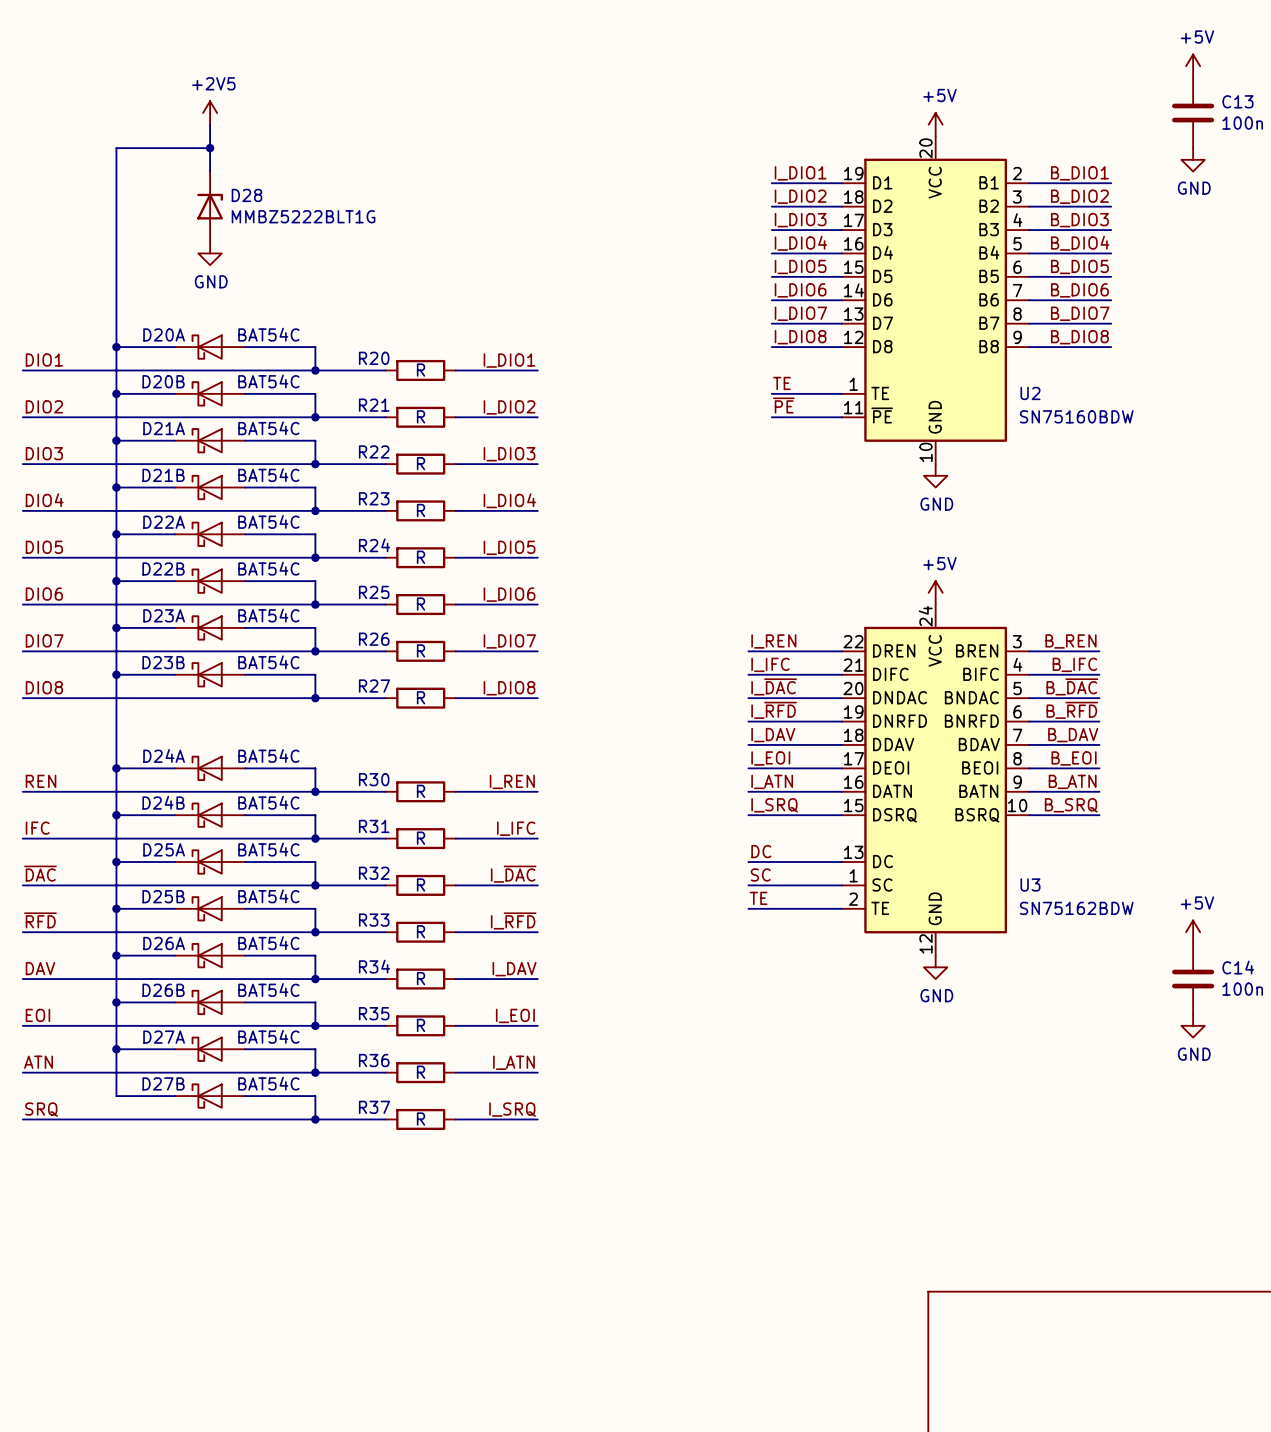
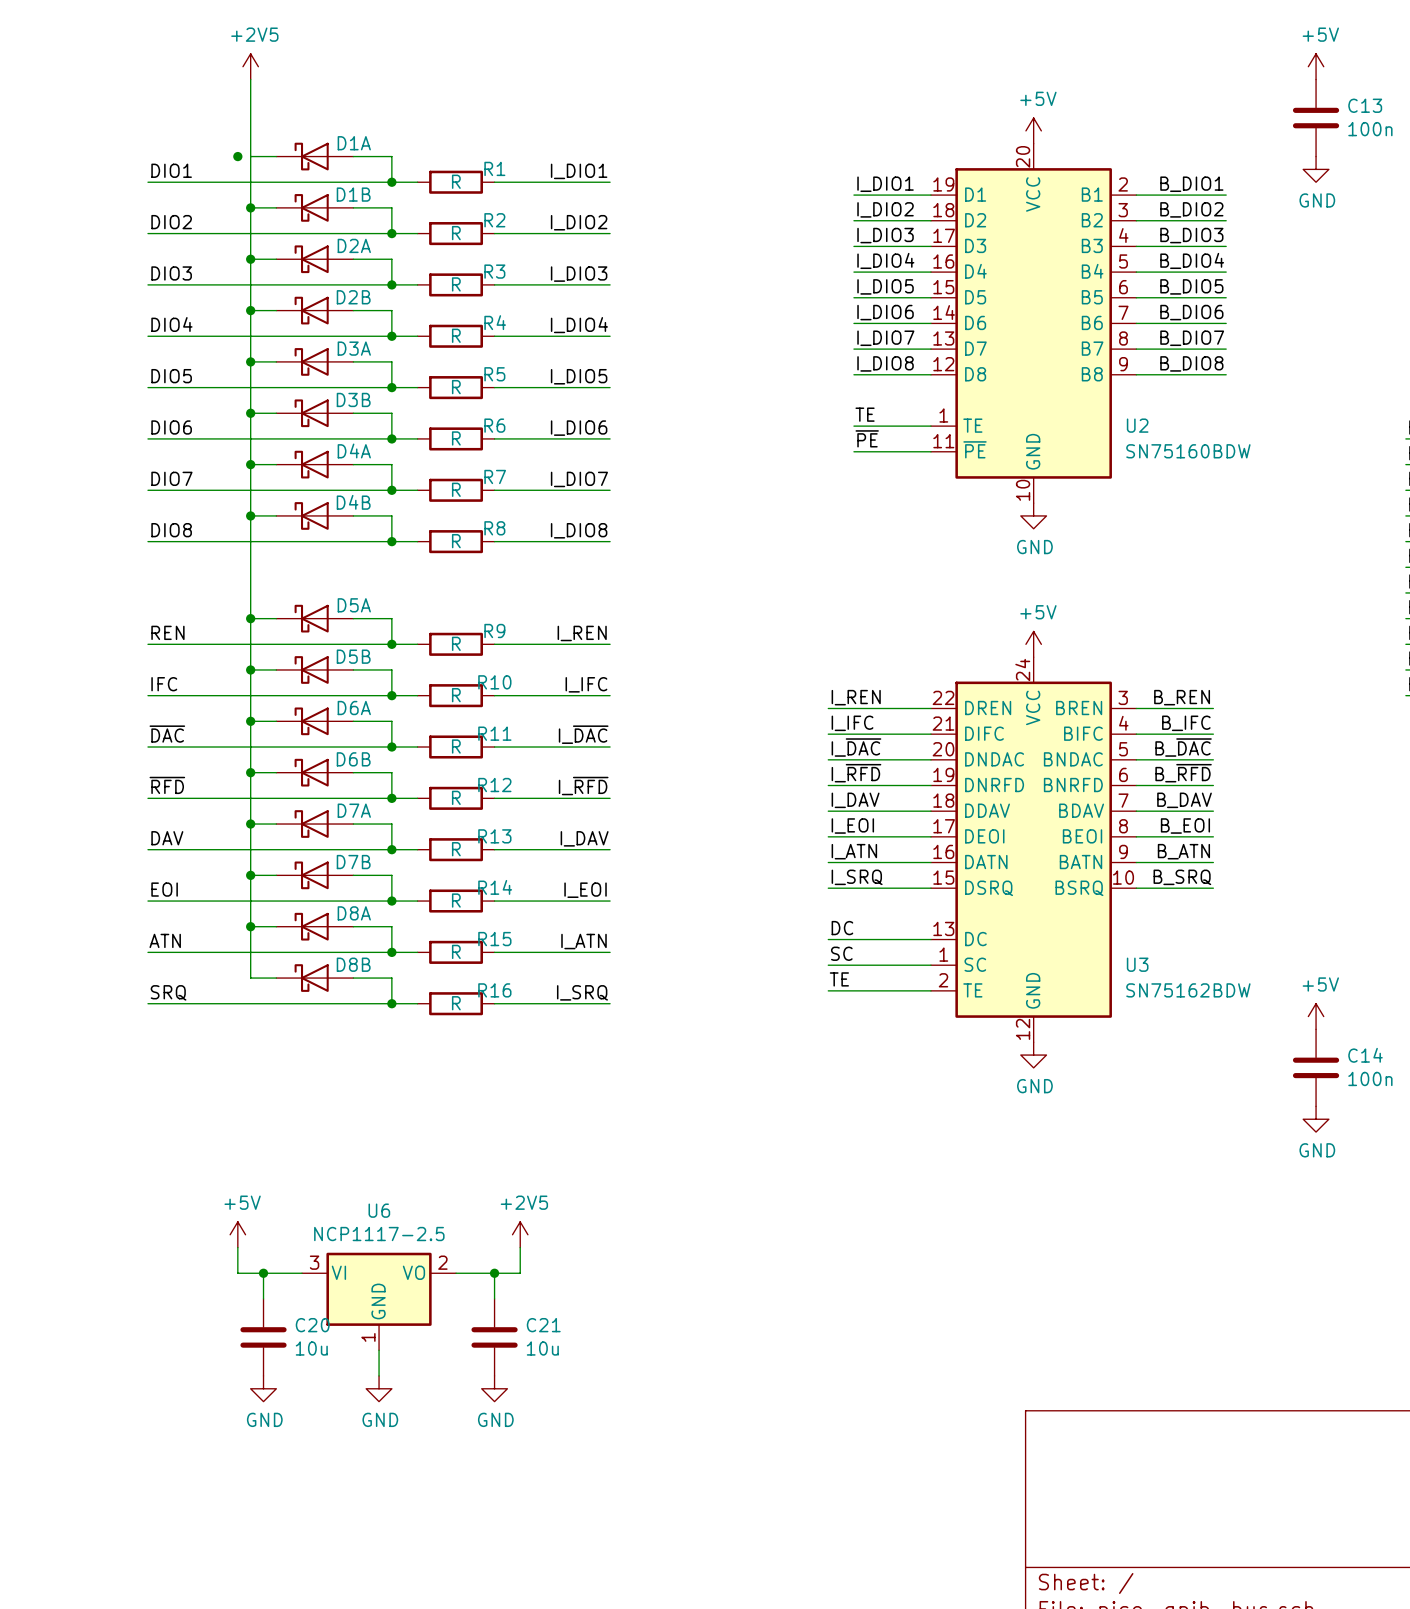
wire: none -> (250, 79) (250, 978) (276, 978)
power symbol position: +2V5 (210, 113) -> +2V5 (250, 66)
wire: (210, 124) (210, 171) -> none
wire: (210, 148) (116, 148) (116, 1096) (174, 1096) -> none
wire: none -> (250, 156) (276, 156)
D1A: none -> (314, 156)
wire: none -> (353, 156) (391, 156) (391, 182)
wire: none -> (147, 182) (417, 182)
junction: none -> (391, 182)
R1: none -> R (456, 182)
wire: none -> (494, 182) (610, 182)
wire: none -> (250, 207) (276, 207)
junction: none -> (250, 207)
D1B: none -> (314, 207)
wire: none -> (353, 207) (391, 207) (391, 233)
D28: MMBZ5222BLT1G (210, 206) -> none
wire: none -> (147, 233) (417, 233)
junction: none -> (391, 233)
R2: none -> R (456, 233)
wire: none -> (494, 233) (610, 233)
wire: none -> (250, 259) (276, 259)
junction: none -> (250, 259)
D2A: none -> (314, 259)
wire: none -> (353, 259) (391, 259) (391, 284)
power symbol: GND (210, 253) -> none
wire: none -> (147, 284) (417, 284)
junction: none -> (391, 284)
R3: none -> R (456, 284)
wire: none -> (494, 284) (610, 284)
wire: none -> (250, 310) (276, 310)
junction: none -> (250, 310)
D2B: none -> (314, 310)
wire: none -> (353, 310) (391, 310) (391, 336)
wire: none -> (147, 336) (417, 336)
junction: none -> (391, 336)
R4: none -> R (456, 336)
wire: none -> (494, 336) (610, 336)
wire: none -> (250, 361) (276, 361)
junction: none -> (250, 361)
D3A: none -> (314, 361)
wire: none -> (353, 361) (391, 361) (391, 387)
wire: (116, 347) (174, 347) -> none
junction: (116, 347) -> none
D20A: BAT54C (210, 347) -> none
wire: (245, 347) (315, 347) (315, 370) -> none
wire: none -> (147, 387) (417, 387)
junction: none -> (391, 387)
R5: none -> R (456, 387)
wire: none -> (494, 387) (610, 387)
label position: DIO1 (44, 360) -> DIO1 (171, 170)
label position: I_DIO1 (509, 360) -> I_DIO1 (579, 171)
wire: (22, 370) (385, 370) -> none
junction: (315, 370) -> none
R20: R (420, 370) -> none
wire: (455, 370) (537, 370) -> none
wire: none -> (250, 413) (276, 413)
junction: none -> (250, 413)
D3B: none -> (314, 413)
wire: none -> (353, 413) (391, 413) (391, 438)
wire: (116, 393) (174, 393) -> none
junction: (116, 393) -> none
D20B: BAT54C (210, 393) -> none
wire: (245, 393) (315, 393) (315, 417) -> none
wire: none -> (147, 438) (417, 438)
junction: none -> (391, 438)
R6: none -> R (456, 438)
wire: none -> (494, 438) (610, 438)
label position: DIO2 (44, 406) -> DIO2 (171, 222)
label position: I_DIO2 (509, 407) -> I_DIO2 (579, 222)
wire: (22, 417) (385, 417) -> none
junction: (315, 417) -> none
R21: R (420, 417) -> none
wire: (455, 417) (537, 417) -> none
wire: none -> (250, 464) (276, 464)
junction: none -> (250, 464)
D4A: none -> (314, 464)
wire: none -> (353, 464) (391, 464) (391, 490)
wire: (116, 440) (174, 440) -> none
junction: (116, 440) -> none
D21A: BAT54C (210, 440) -> none
wire: (245, 440) (315, 440) (315, 464) -> none
wire: none -> (147, 490) (417, 490)
junction: none -> (391, 490)
R7: none -> R (456, 490)
wire: none -> (494, 490) (610, 490)
label position: DIO3 (44, 453) -> DIO3 (171, 273)
label position: I_DIO3 (509, 454) -> I_DIO3 (579, 274)
wire: (22, 464) (385, 464) -> none
junction: (315, 464) -> none
R22: R (420, 464) -> none
wire: (455, 464) (537, 464) -> none
wire: none -> (250, 515) (276, 515)
junction: none -> (250, 515)
D4B: none -> (314, 515)
wire: none -> (353, 515) (391, 515) (391, 541)
wire: (116, 487) (174, 487) -> none
junction: (116, 487) -> none
D21B: BAT54C (210, 487) -> none
wire: (245, 487) (315, 487) (315, 510) -> none
wire: none -> (147, 541) (417, 541)
junction: none -> (391, 541)
R8: none -> R (456, 541)
wire: none -> (494, 541) (610, 541)
label position: DIO4 (44, 500) -> DIO4 (171, 324)
label position: I_DIO4 (509, 500) -> I_DIO4 (579, 325)
wire: (22, 510) (385, 510) -> none
junction: (315, 510) -> none
R23: R (420, 510) -> none
wire: (455, 510) (537, 510) -> none
wire: (116, 534) (174, 534) -> none
junction: (116, 534) -> none
D22A: BAT54C (210, 534) -> none
wire: (245, 534) (315, 534) (315, 557) -> none
label position: DIO5 (44, 547) -> DIO5 (171, 376)
label position: I_DIO5 (509, 547) -> I_DIO5 (579, 376)
wire: (22, 557) (385, 557) -> none
junction: (315, 557) -> none
R24: R (420, 557) -> none
wire: (455, 557) (537, 557) -> none
wire: none -> (250, 618) (276, 618)
junction: none -> (250, 618)
D5A: none -> (314, 618)
wire: none -> (353, 618) (391, 618) (391, 644)
wire: (116, 581) (174, 581) -> none
junction: (116, 581) -> none
D22B: BAT54C (210, 581) -> none
wire: (245, 581) (315, 581) (315, 604) -> none
wire: none -> (147, 644) (417, 644)
junction: none -> (391, 644)
R9: none -> R (456, 644)
wire: none -> (494, 644) (610, 644)
label position: DIO6 (44, 594) -> DIO6 (171, 427)
label position: I_DIO6 (509, 594) -> I_DIO6 (579, 428)
wire: (22, 604) (385, 604) -> none
junction: (315, 604) -> none
R25: R (420, 604) -> none
wire: (455, 604) (537, 604) -> none
wire: none -> (250, 669) (276, 669)
junction: none -> (250, 669)
D5B: none -> (314, 669)
wire: none -> (353, 669) (391, 669) (391, 695)
wire: (116, 627) (174, 627) -> none
junction: (116, 627) -> none
D23A: BAT54C (210, 627) -> none
wire: (245, 627) (315, 627) (315, 651) -> none
wire: none -> (147, 695) (417, 695)
junction: none -> (391, 695)
R10: none -> R (456, 695)
wire: none -> (494, 695) (610, 695)
label position: DIO7 (44, 640) -> DIO7 (171, 478)
label position: I_DIO7 (509, 641) -> I_DIO7 (579, 479)
wire: (22, 651) (385, 651) -> none
junction: (315, 651) -> none
R26: R (420, 651) -> none
wire: (455, 651) (537, 651) -> none
wire: none -> (250, 721) (276, 721)
junction: none -> (250, 721)
D6A: none -> (314, 721)
wire: none -> (353, 721) (391, 721) (391, 747)
wire: (116, 674) (174, 674) -> none
junction: (116, 674) -> none
D23B: BAT54C (210, 674) -> none
wire: (245, 674) (315, 674) (315, 698) -> none
wire: none -> (147, 747) (417, 747)
junction: none -> (391, 747)
R11: none -> R (456, 747)
wire: none -> (494, 747) (610, 747)
label position: DIO8 (44, 687) -> DIO8 (171, 530)
label position: I_DIO8 (509, 688) -> I_DIO8 (579, 530)
wire: (22, 698) (385, 698) -> none
junction: (315, 698) -> none
R27: R (420, 698) -> none
wire: (455, 698) (537, 698) -> none
wire: none -> (250, 772) (276, 772)
junction: none -> (250, 772)
D6B: none -> (314, 772)
wire: none -> (353, 772) (391, 772) (391, 798)
wire: none -> (147, 798) (417, 798)
junction: none -> (391, 798)
R12: none -> R (456, 798)
wire: none -> (494, 798) (610, 798)
wire: none -> (250, 824) (276, 824)
junction: none -> (250, 824)
D7A: none -> (314, 824)
wire: none -> (353, 824) (391, 824) (391, 849)
wire: (116, 768) (174, 768) -> none
junction: (116, 768) -> none
D24A: BAT54C (210, 768) -> none
wire: (245, 768) (315, 768) (315, 791) -> none
wire: none -> (147, 849) (417, 849)
junction: none -> (391, 849)
R13: none -> R (456, 849)
wire: none -> (494, 849) (610, 849)
label position: REN (41, 781) -> REN (167, 632)
label position: I_REN (512, 781) -> I_REN (582, 633)
wire: (22, 791) (385, 791) -> none
junction: (315, 791) -> none
R30: R (420, 791) -> none
wire: (455, 791) (537, 791) -> none
wire: none -> (250, 875) (276, 875)
junction: none -> (250, 875)
D7B: none -> (314, 875)
wire: none -> (353, 875) (391, 875) (391, 901)
wire: (116, 815) (174, 815) -> none
junction: (116, 815) -> none
D24B: BAT54C (210, 815) -> none
wire: (245, 815) (315, 815) (315, 838) -> none
wire: none -> (147, 901) (417, 901)
junction: none -> (391, 901)
R14: none -> R (456, 901)
wire: none -> (494, 901) (610, 901)
label position: IFC (37, 828) -> IFC (164, 684)
label position: I_IFC (516, 828) -> I_IFC (586, 684)
wire: (22, 838) (385, 838) -> none
junction: (315, 838) -> none
R31: R (420, 838) -> none
wire: (455, 838) (537, 838) -> none
wire: none -> (250, 926) (276, 926)
junction: none -> (250, 926)
D8A: none -> (314, 926)
wire: none -> (353, 926) (391, 926) (391, 952)
wire: (116, 862) (174, 862) -> none
junction: (116, 862) -> none
D25A: BAT54C (210, 862) -> none
wire: (245, 862) (315, 862) (315, 885) -> none
label position: ~{DAC} (40, 873) -> ~{DAC} (167, 734)
wire: none -> (147, 952) (417, 952)
junction: none -> (391, 952)
R15: none -> R (456, 952)
wire: none -> (494, 952) (610, 952)
label position: I_~{DAC} (513, 874) -> I_~{DAC} (583, 734)
wire: (22, 885) (385, 885) -> none
junction: (315, 885) -> none
R32: R (420, 885) -> none
wire: (455, 885) (537, 885) -> none
D8B: none -> (314, 978)
wire: none -> (353, 978) (391, 978) (391, 1003)
wire: (116, 908) (174, 908) -> none
junction: (116, 908) -> none
D25B: BAT54C (210, 908) -> none
wire: (245, 908) (315, 908) (315, 932) -> none
label position: ~{RFD} (40, 920) -> ~{RFD} (167, 785)
wire: none -> (147, 1003) (417, 1003)
junction: none -> (391, 1003)
R16: none -> R (456, 1003)
wire: none -> (494, 1003) (610, 1003)
label position: I_~{RFD} (513, 920) -> I_~{RFD} (583, 786)
wire: (22, 932) (385, 932) -> none
junction: (315, 932) -> none
R33: R (420, 932) -> none
wire: (455, 932) (537, 932) -> none
wire: (116, 955) (174, 955) -> none
junction: (116, 955) -> none
D26A: BAT54C (210, 955) -> none
wire: (245, 955) (315, 955) (315, 979) -> none
label position: DAV (40, 968) -> DAV (167, 838)
label position: I_DAV (514, 969) -> I_DAV (584, 838)
wire: (22, 979) (385, 979) -> none
junction: (315, 979) -> none
R34: R (420, 979) -> none
wire: (455, 979) (537, 979) -> none
wire: (116, 1002) (174, 1002) -> none
junction: (116, 1002) -> none
D26B: BAT54C (210, 1002) -> none
wire: (245, 1002) (315, 1002) (315, 1025) -> none
label position: EOI (37, 1015) -> EOI (164, 889)
label position: I_EOI (515, 1015) -> I_EOI (585, 890)
wire: (22, 1025) (385, 1025) -> none
junction: (315, 1025) -> none
R35: R (420, 1025) -> none
wire: (455, 1025) (537, 1025) -> none
wire: (116, 1049) (174, 1049) -> none
junction: (116, 1049) -> none
D27A: BAT54C (210, 1049) -> none
wire: (245, 1049) (315, 1049) (315, 1072) -> none
label position: ATN (38, 1062) -> ATN (165, 940)
label position: I_ATN (513, 1062) -> I_ATN (584, 941)
wire: (22, 1072) (385, 1072) -> none
junction: (315, 1072) -> none
R36: R (420, 1072) -> none
wire: (455, 1072) (537, 1072) -> none
D27B: BAT54C (210, 1096) -> none
wire: (245, 1096) (315, 1096) (315, 1119) -> none
label position: SRQ (41, 1109) -> SRQ (168, 992)
label position: I_SRQ (512, 1109) -> I_SRQ (582, 992)
wire: (22, 1119) (385, 1119) -> none
junction: (315, 1119) -> none
R37: R (420, 1119) -> none
wire: (455, 1119) (537, 1119) -> none
power symbol: none -> +5V (237, 1234)
power symbol: none -> +2V5 (520, 1234)
wire: none -> (237, 1247) (237, 1273) (302, 1273)
wire: none -> (520, 1247) (520, 1273) (456, 1273)
wire: none -> (263, 1273) (263, 1298)
junction: none -> (263, 1273)
wire: none -> (494, 1273) (494, 1298)
junction: none -> (494, 1273)
U6: none -> NCP1117-2.5 (379, 1301)
C20: none -> 10u (263, 1337)
C21: none -> 10u (494, 1337)
wire: none -> (379, 1350) (379, 1375)
power symbol: none -> GND (263, 1388)
power symbol: none -> GND (379, 1388)
power symbol: none -> GND (494, 1388)

